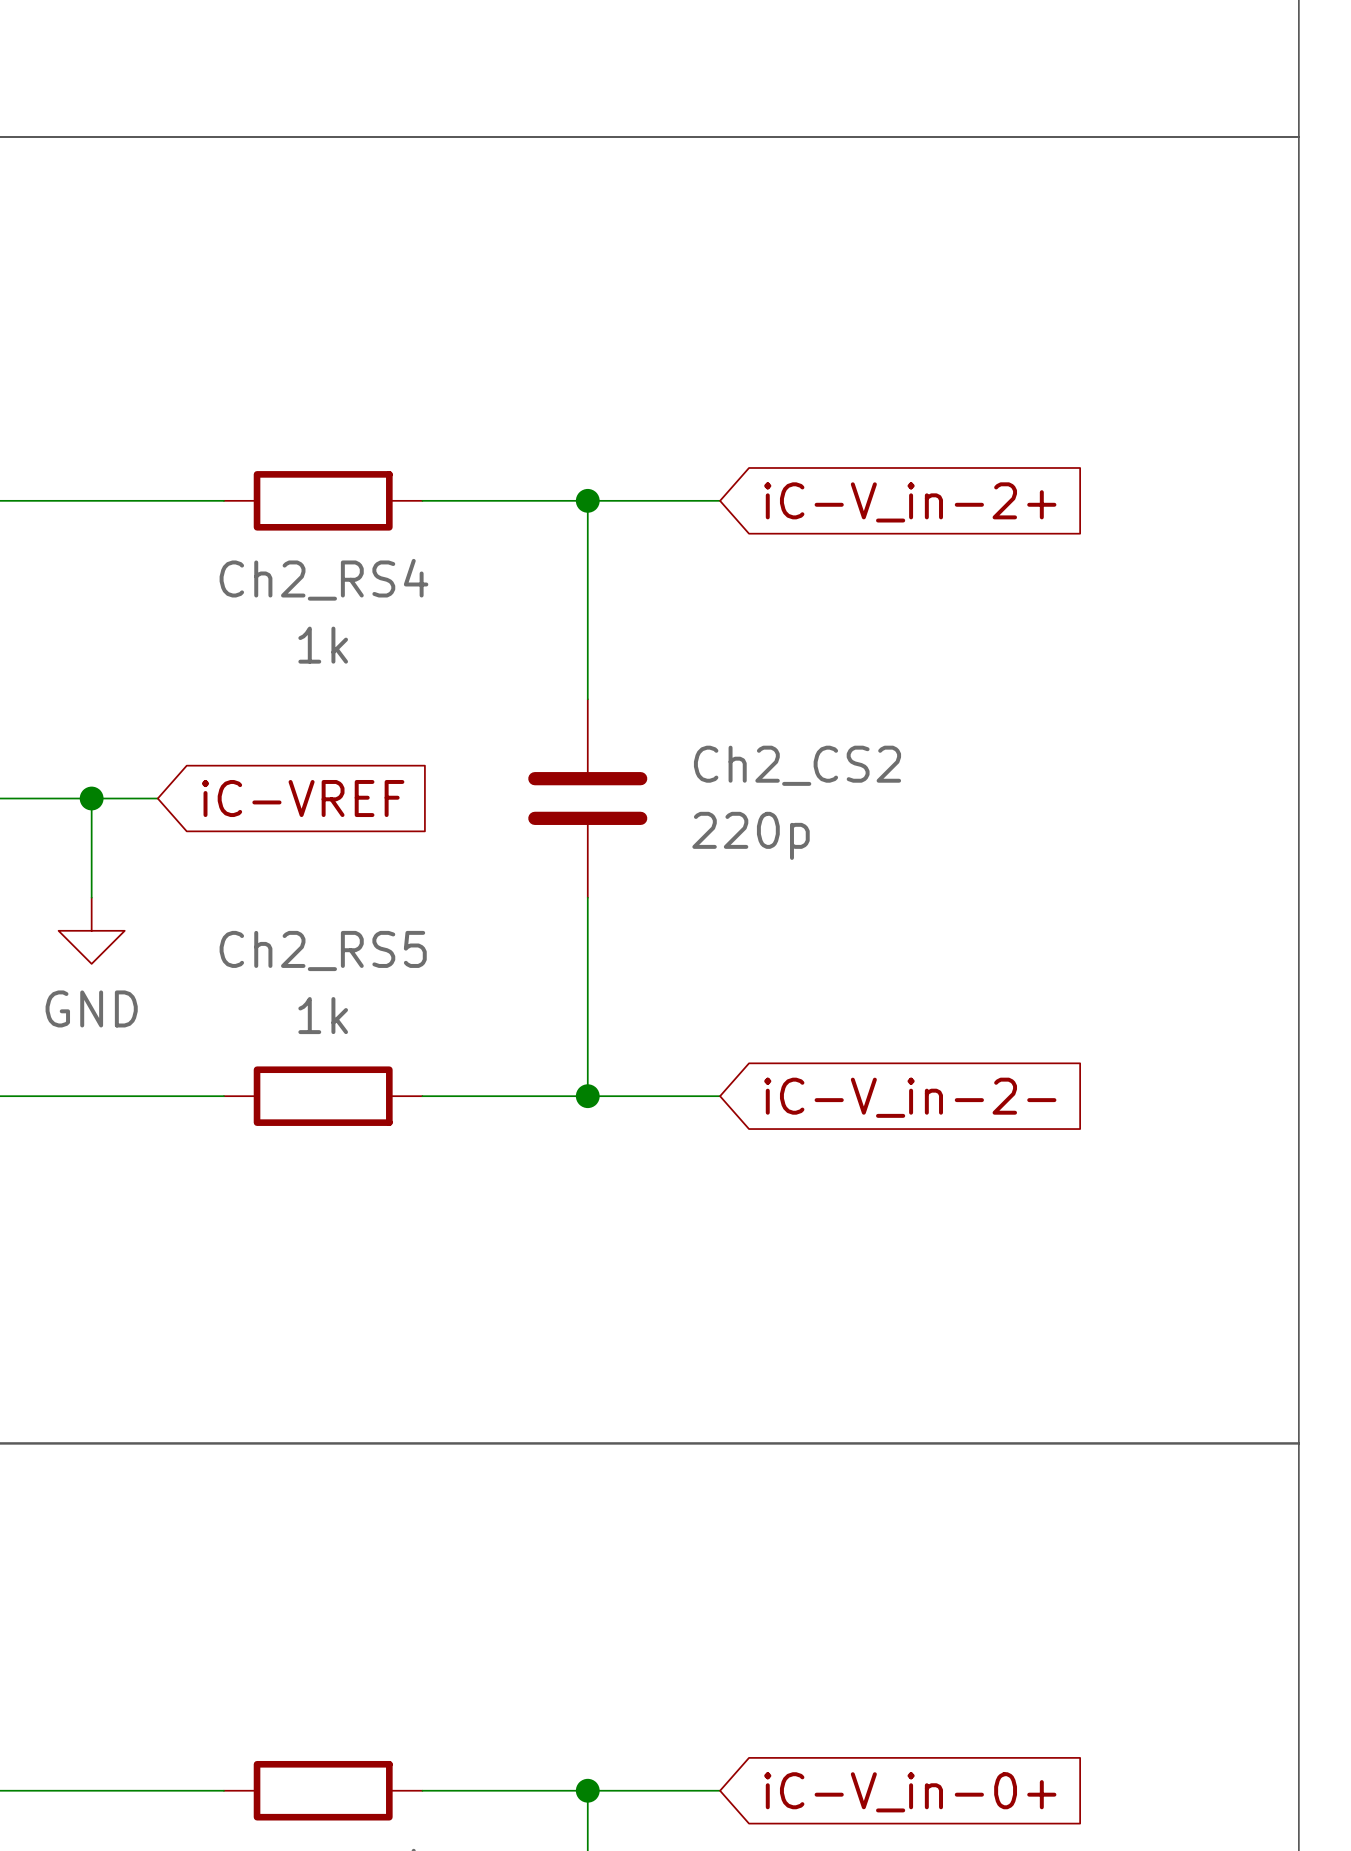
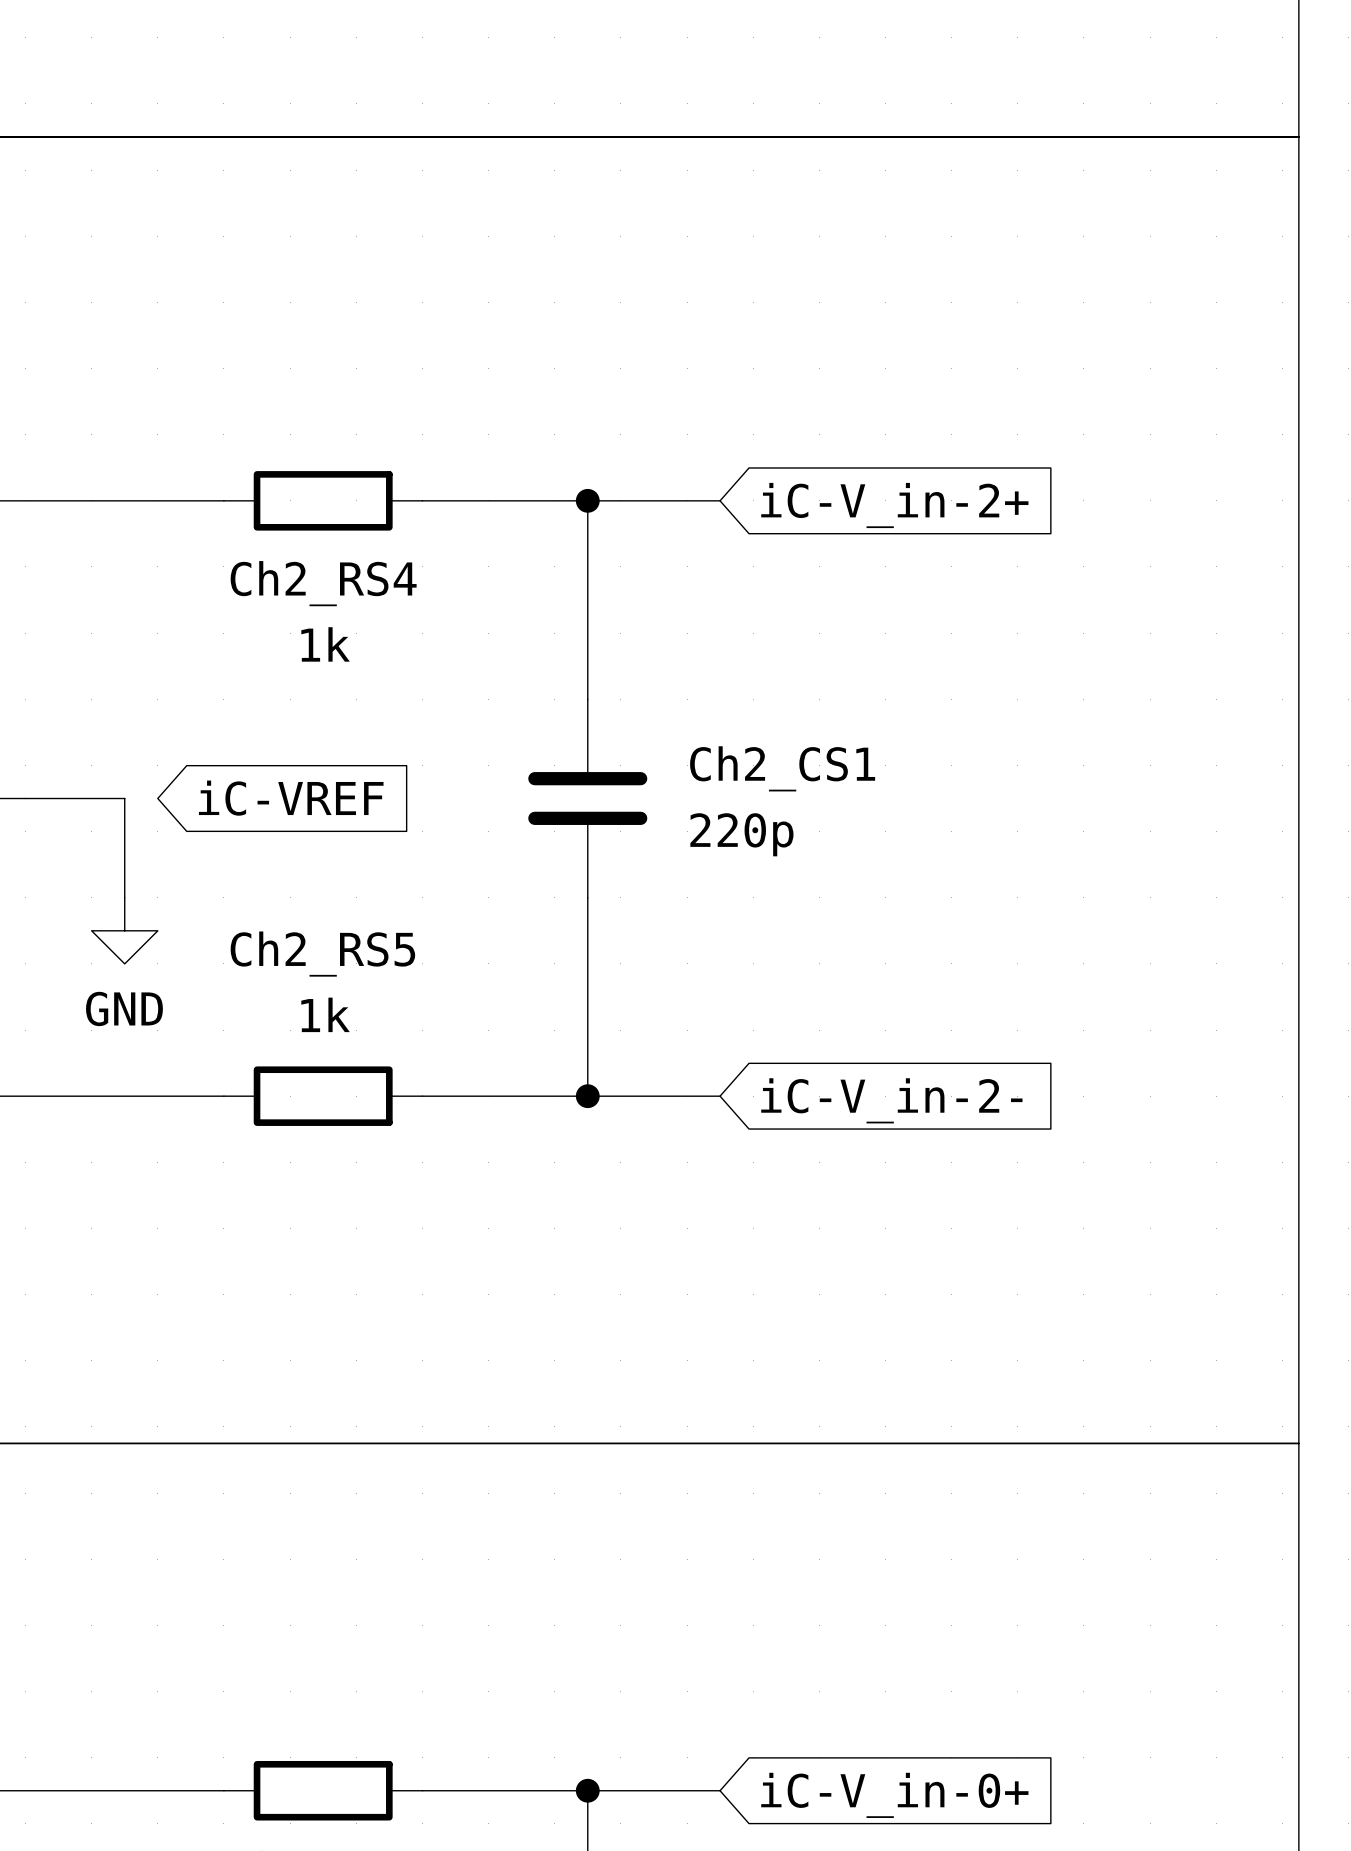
Ch2_CS2 name: Ch2_CS2 (797, 765) -> Ch2_CS1 (782, 768)
wire: (91, 798) (91, 897) -> none
junction: (91, 798) -> none
wire: (124, 798) (157, 798) -> (124, 798) (124, 897)
power symbol position: GND (91, 930) -> GND (124, 930)

